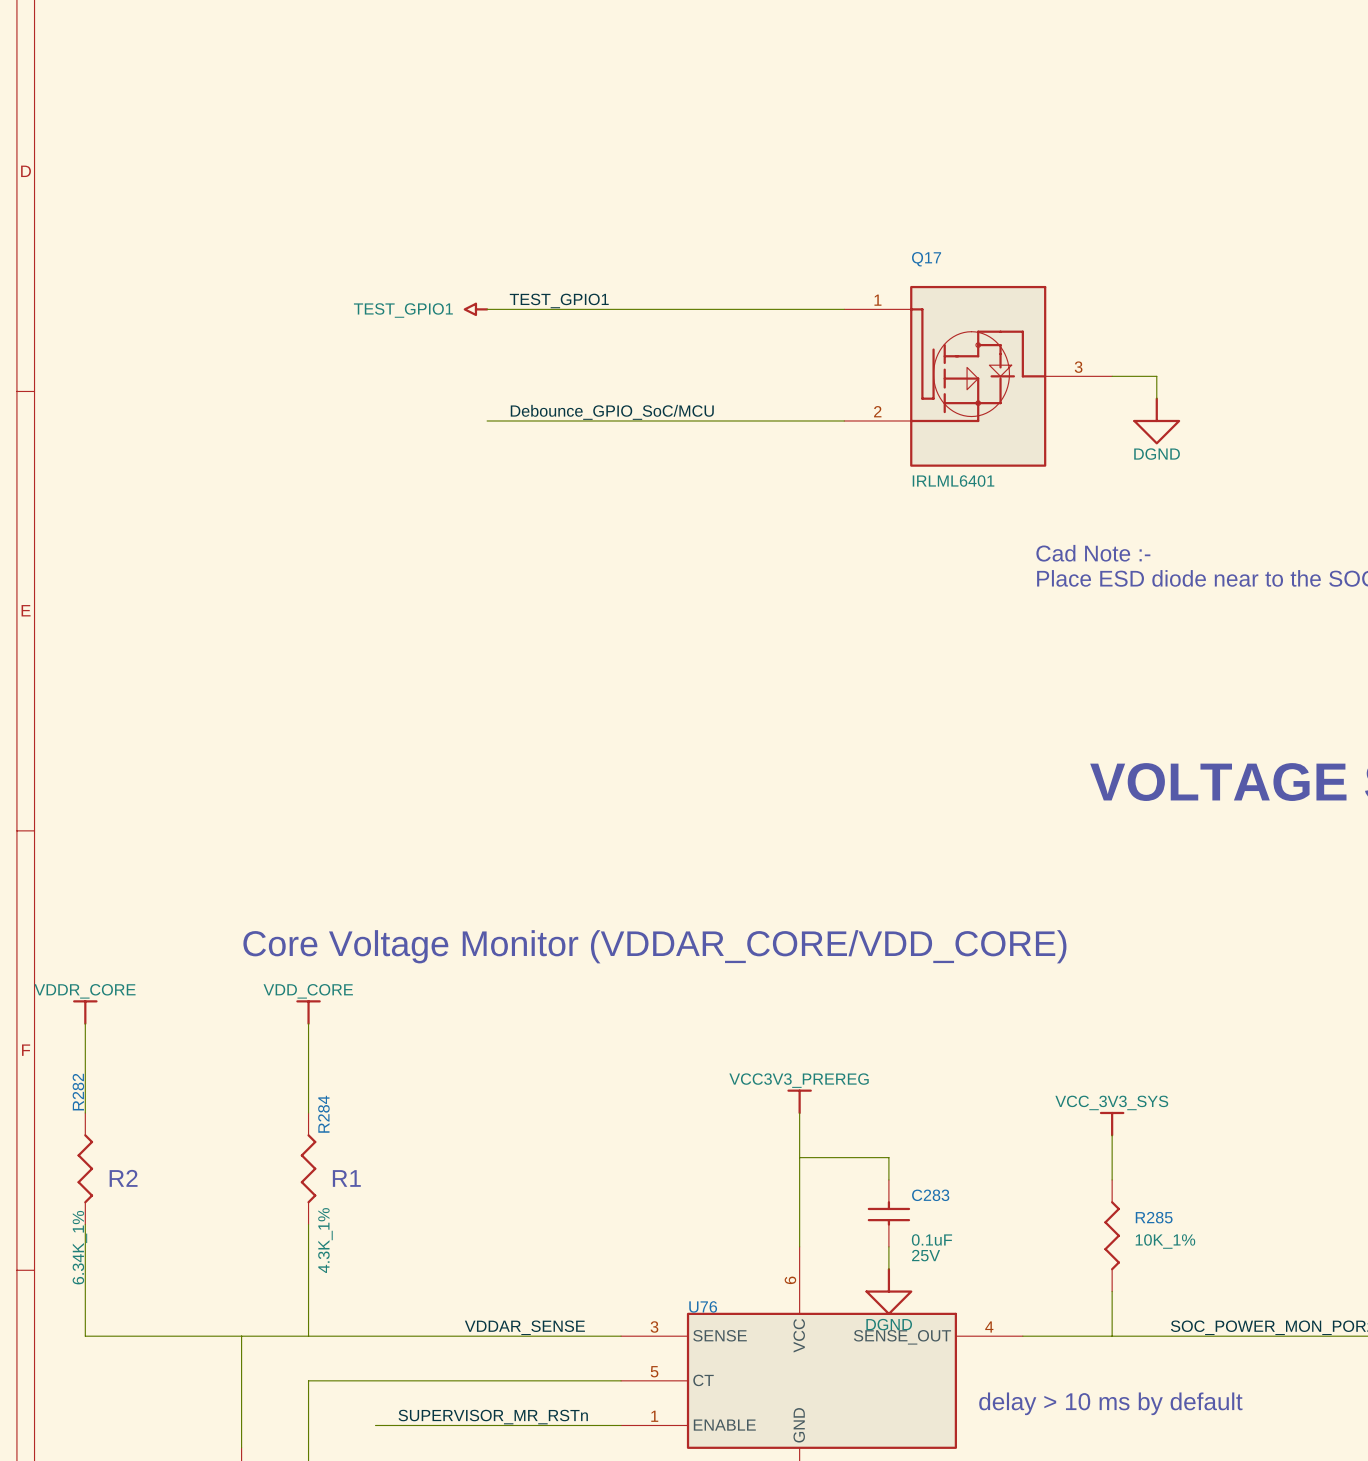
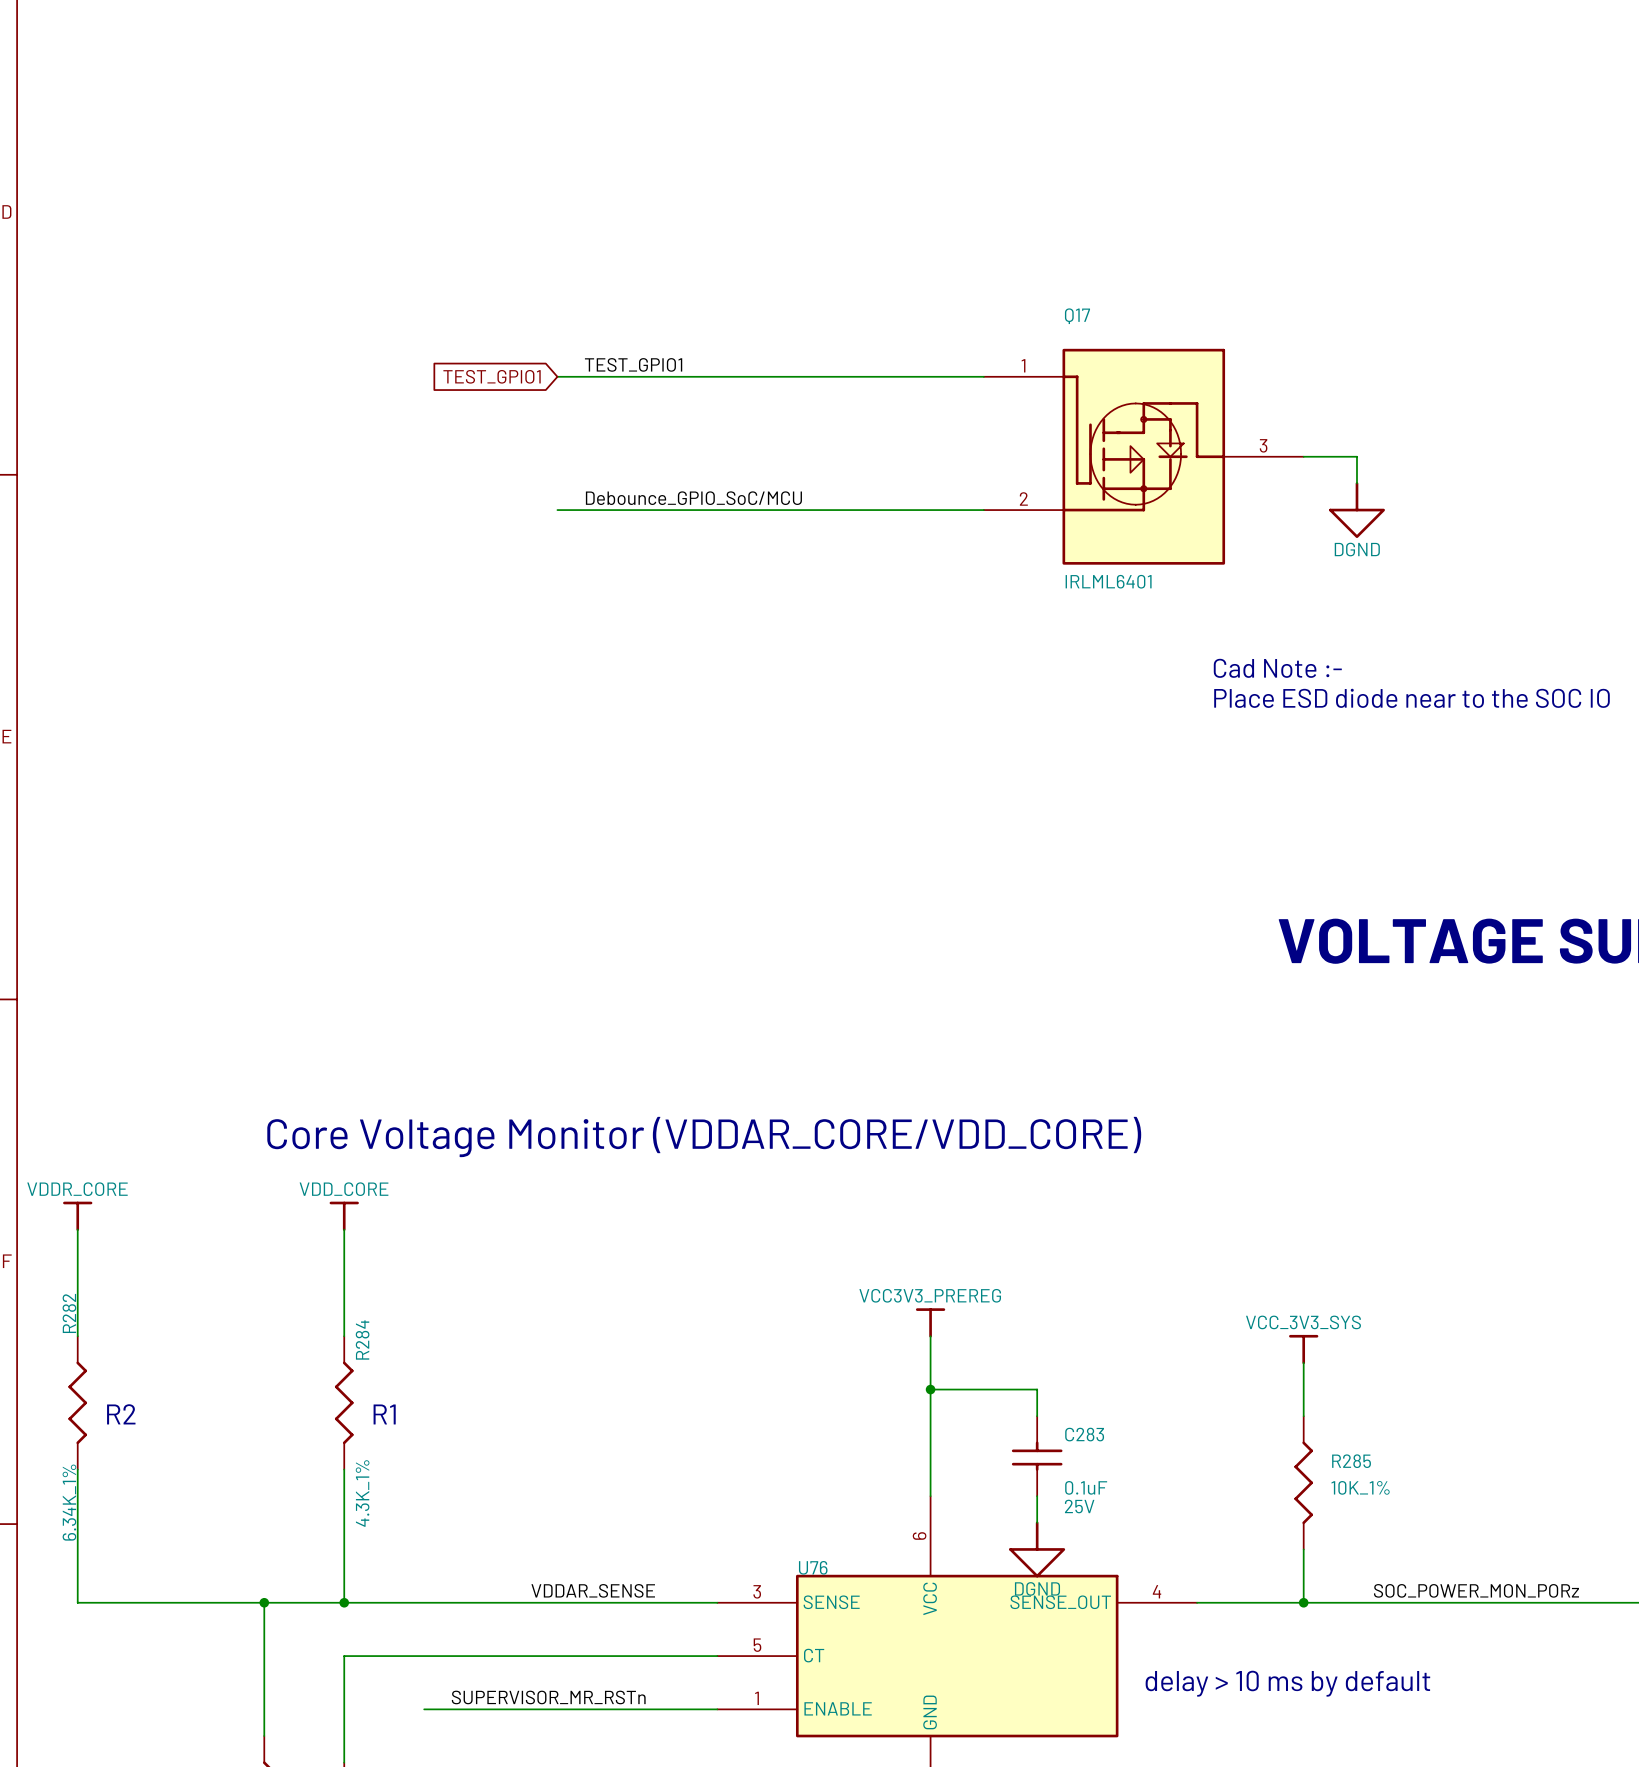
power symbol: TEST_GPIO1 (475, 309) -> none
global label: none -> TEST_GPIO1 (492, 376)
junction: none -> (930, 1389)
junction: none -> (264, 1602)
junction: none -> (344, 1602)
junction: none -> (1303, 1602)

